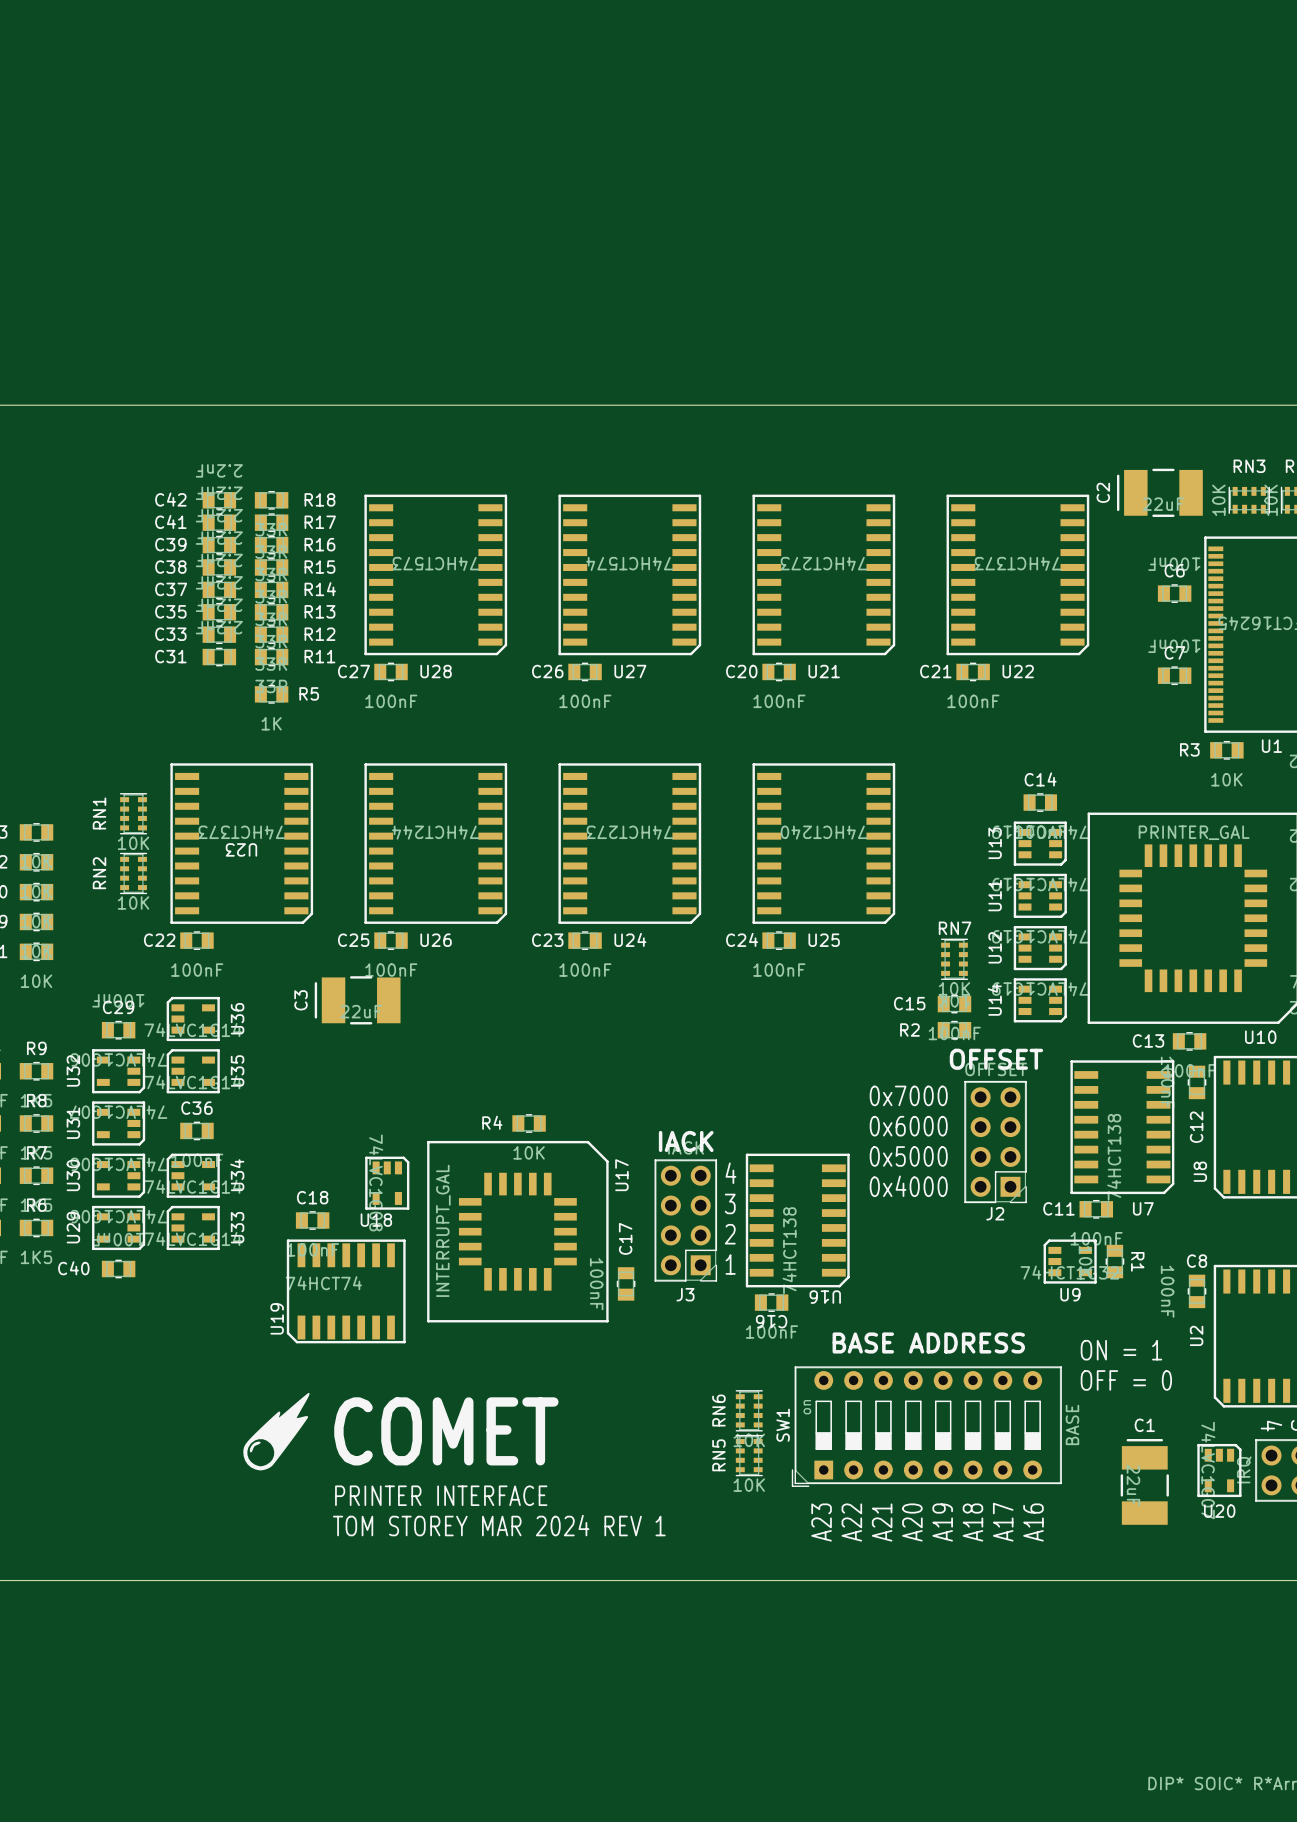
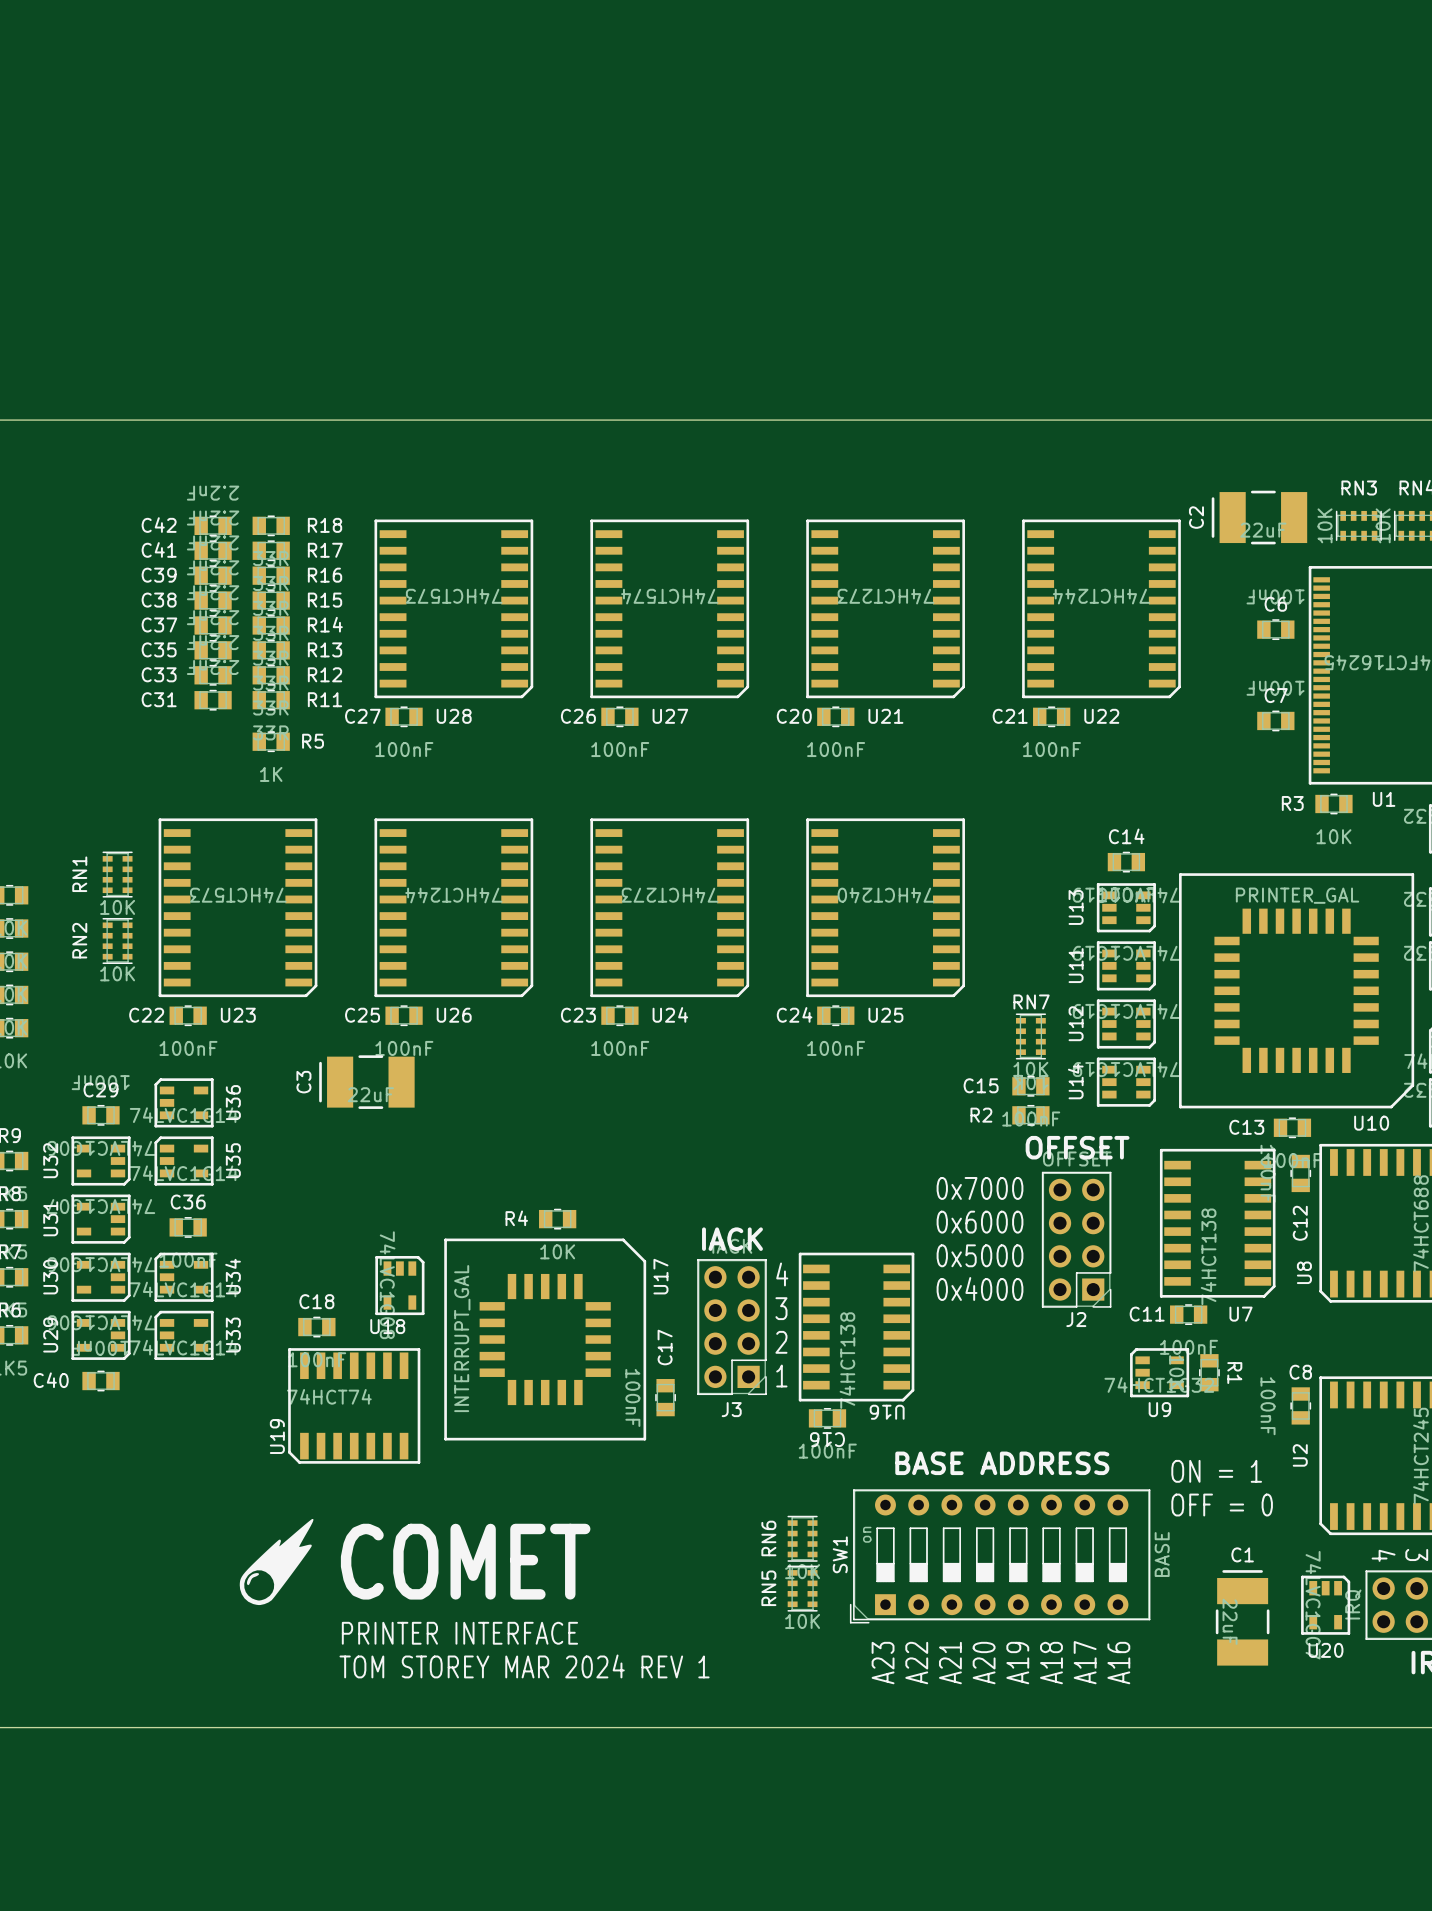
U22 value: 74HCT373 (1018, 563) -> 74HCT244 (1101, 596)
U23 value: 74HCT373 (242, 832) -> 74HCT573 (238, 895)
U23 name rotation: 0° (241, 849) -> 180° (238, 1015)
U23 name position: U23 (241, 849) -> U23 (238, 1015)

